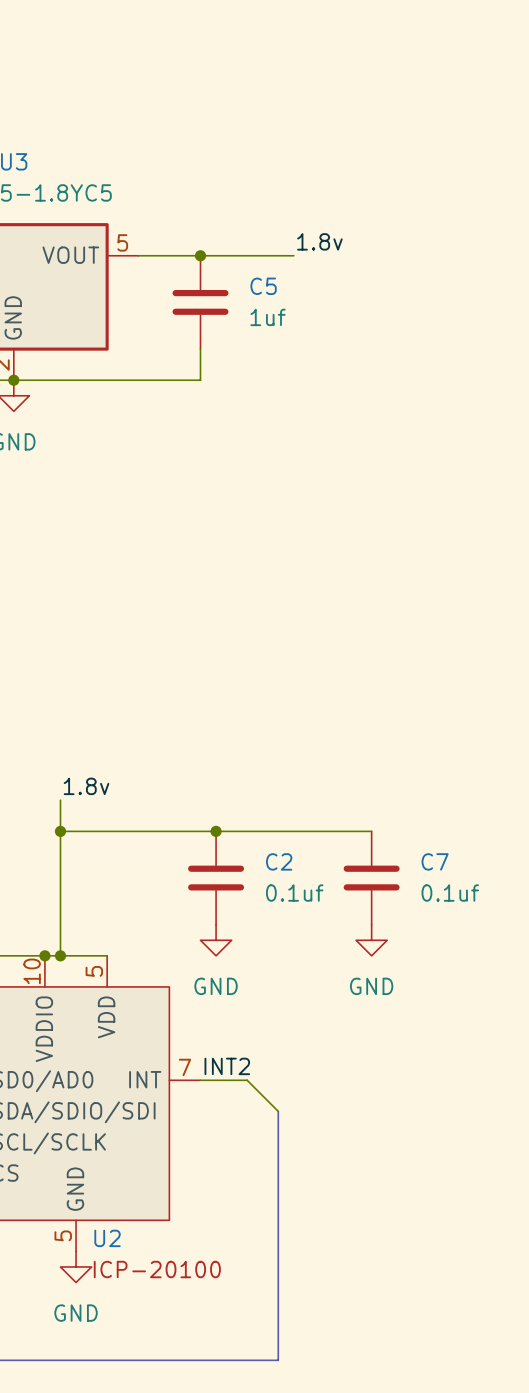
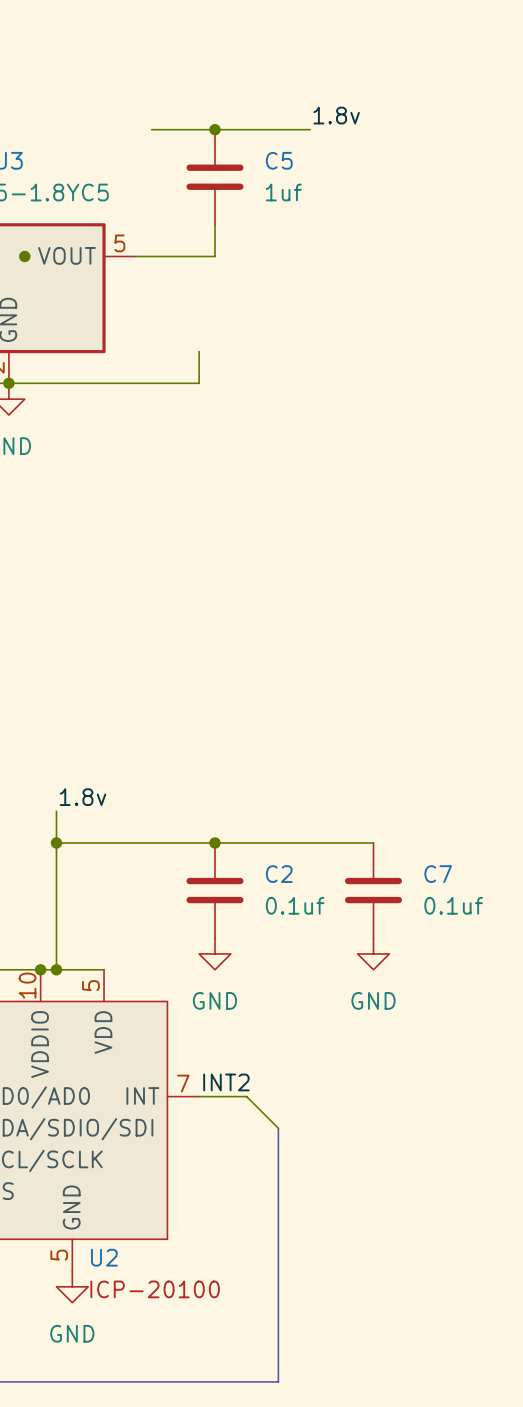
wire: none -> (151, 129) (310, 129)
junction: none -> (214, 129)
label position: 1.8v (319, 241) -> 1.8v (336, 115)
junction: none -> (24, 256)
junction: (200, 255) -> none
wire: (216, 255) (293, 255) -> (214, 256) (214, 224)
C5 position: (200, 302) -> (214, 177)

